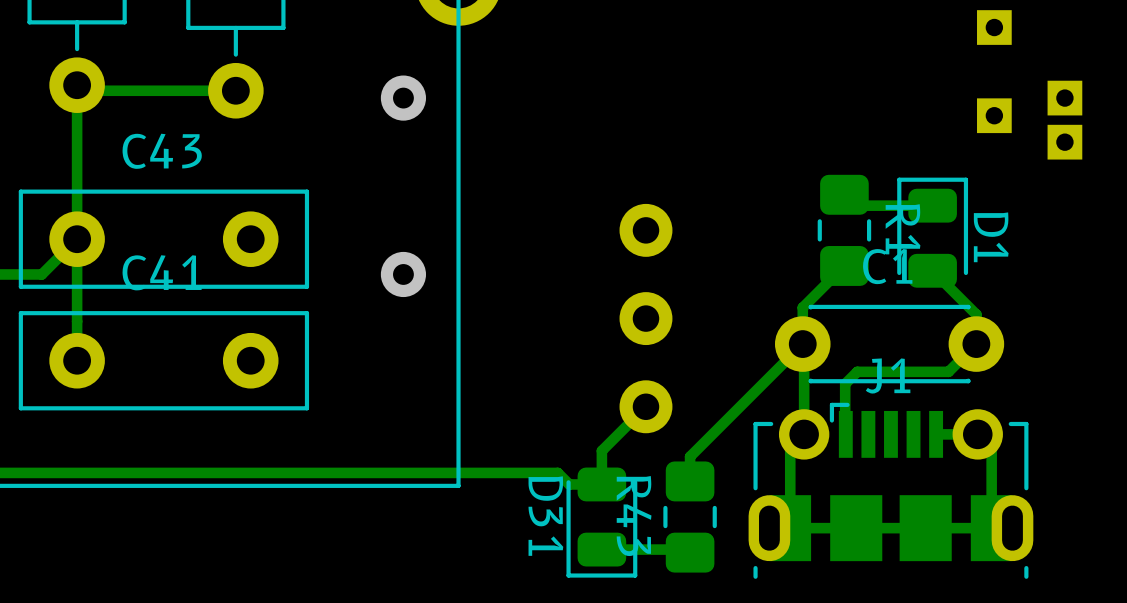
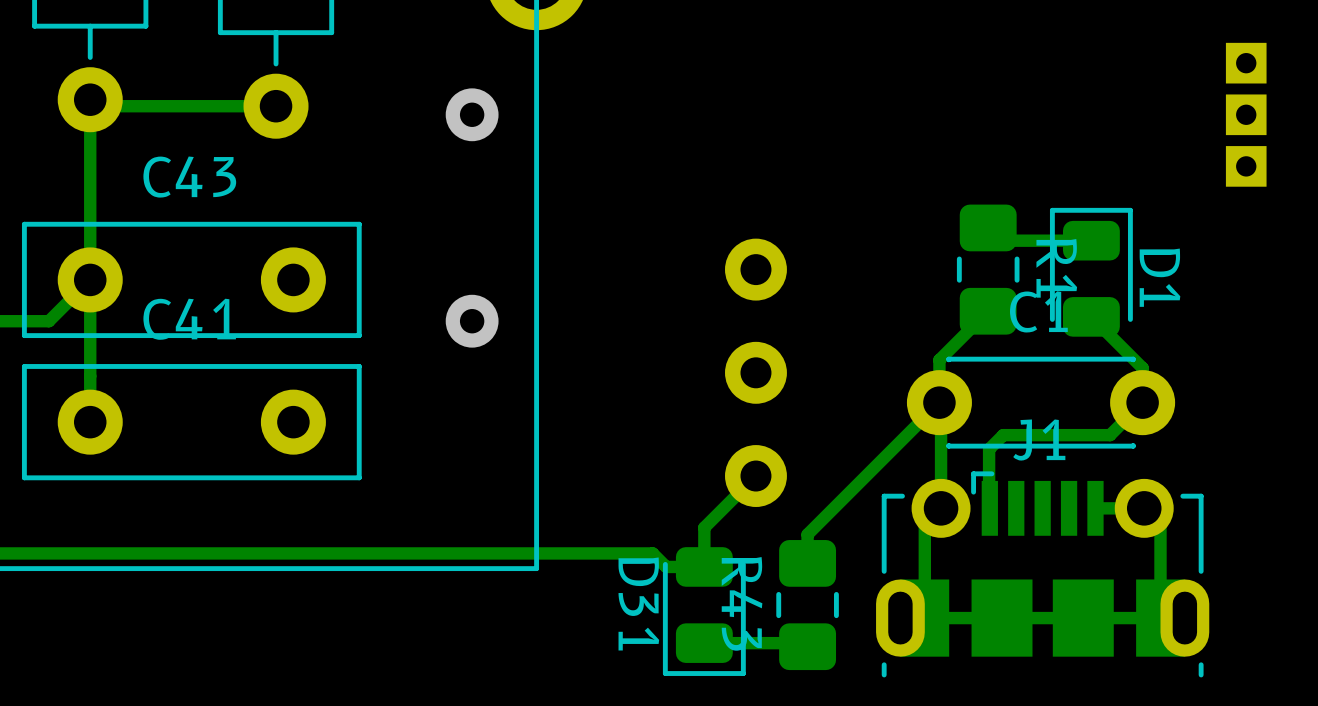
part: (994, 27) -> none
part: none -> (1246, 63)
part: (994, 115) -> none

